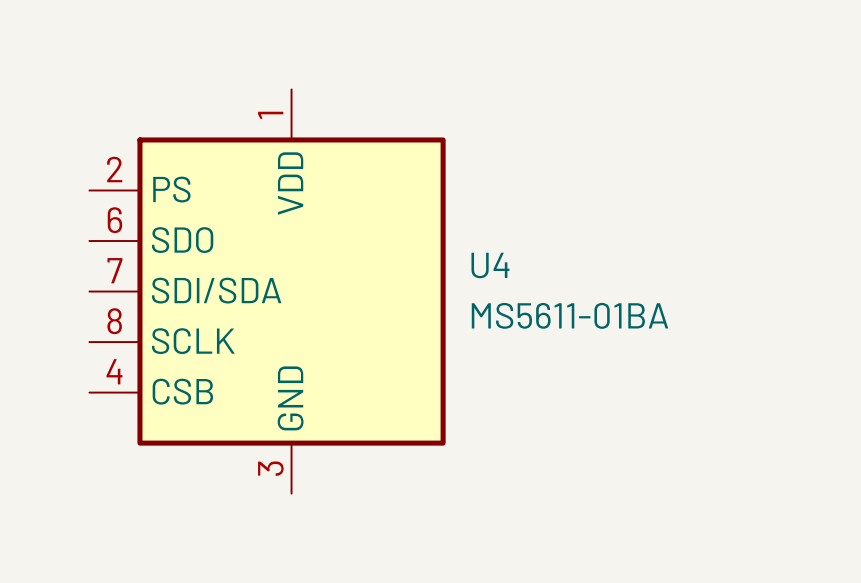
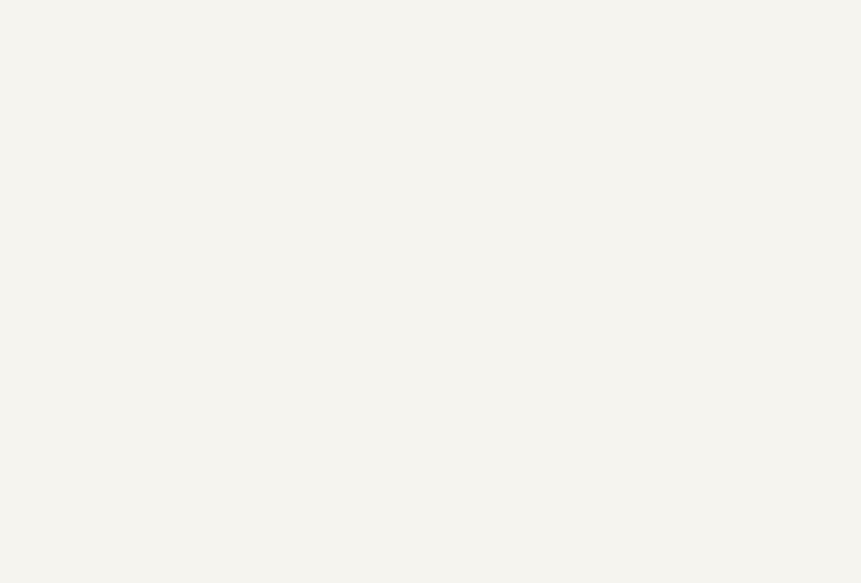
U4: MS5611-01BA (267, 291) -> none

